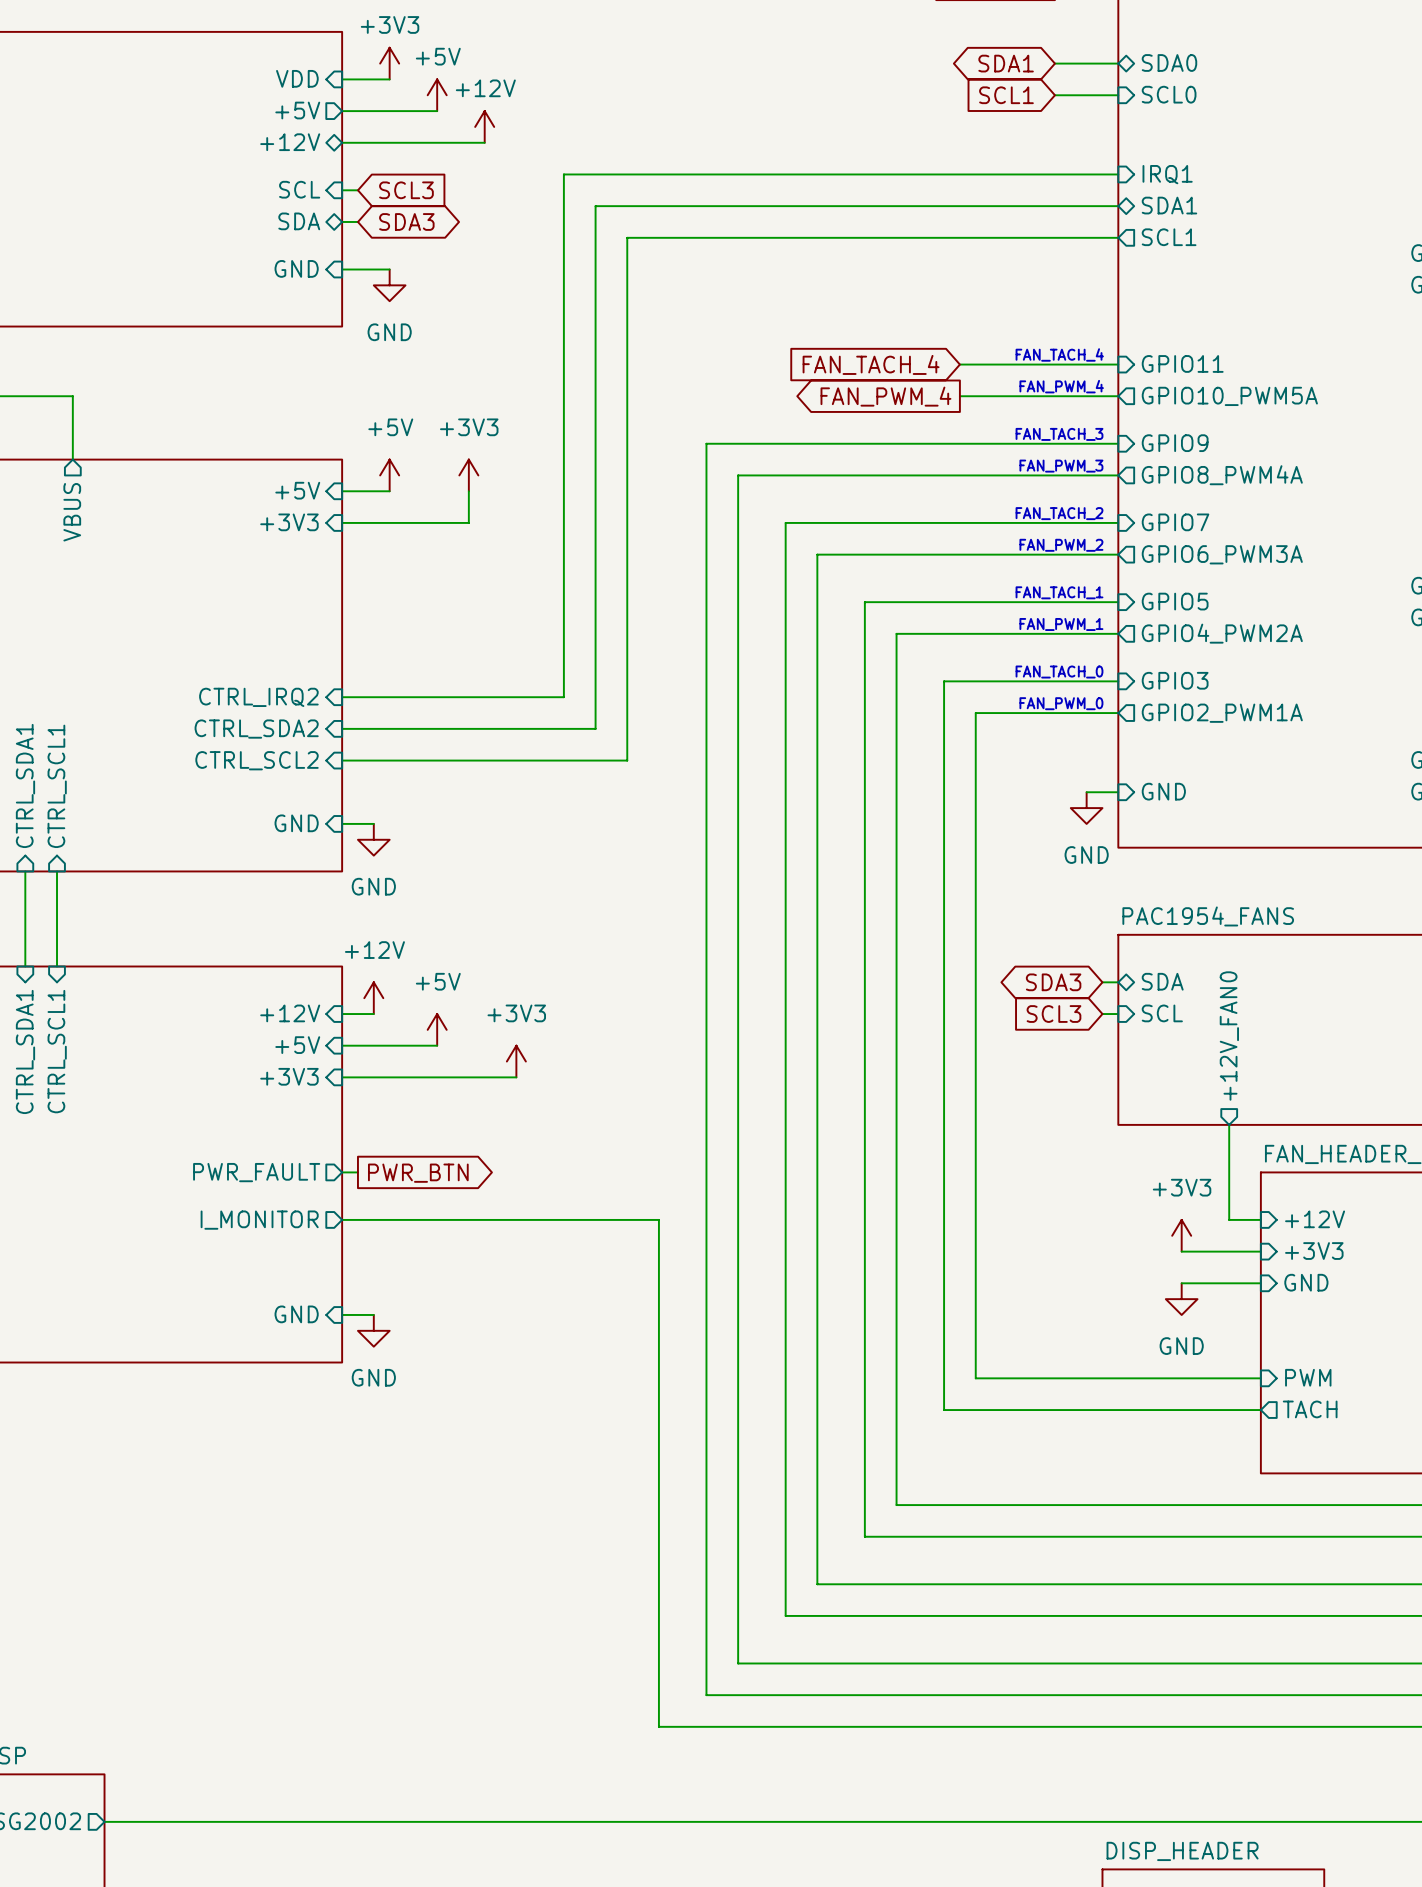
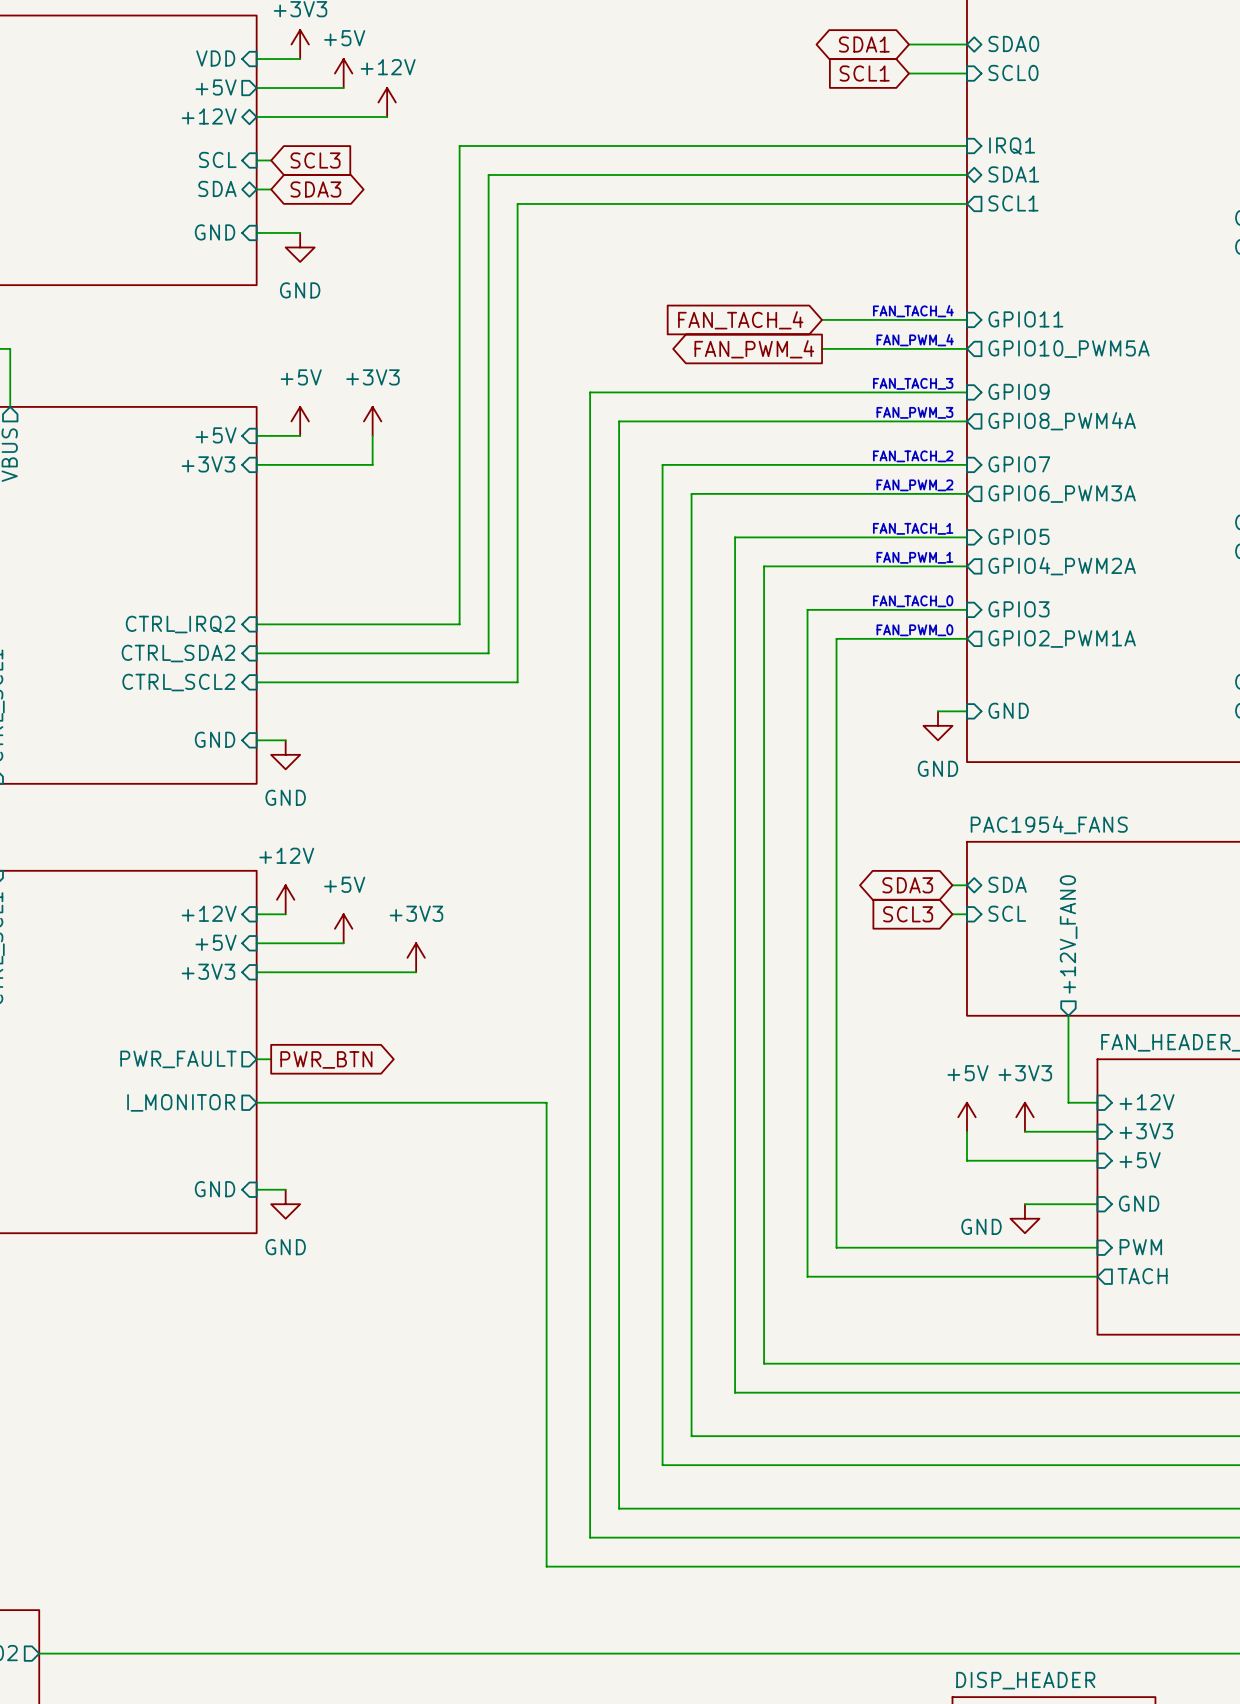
power symbol: none -> +5V (966, 1117)
wire: none -> (966, 1131) (966, 1160) (1024, 1160)
sheet pin: GND (1306, 1282) -> +5V (1140, 1160)
power symbol position: GND (1181, 1299) -> GND (1024, 1218)
wire: none -> (1024, 1204) (1097, 1204)
sheet pin: none -> GND (1139, 1203)
power symbol text position: GND (1181, 1346) -> GND (981, 1226)

